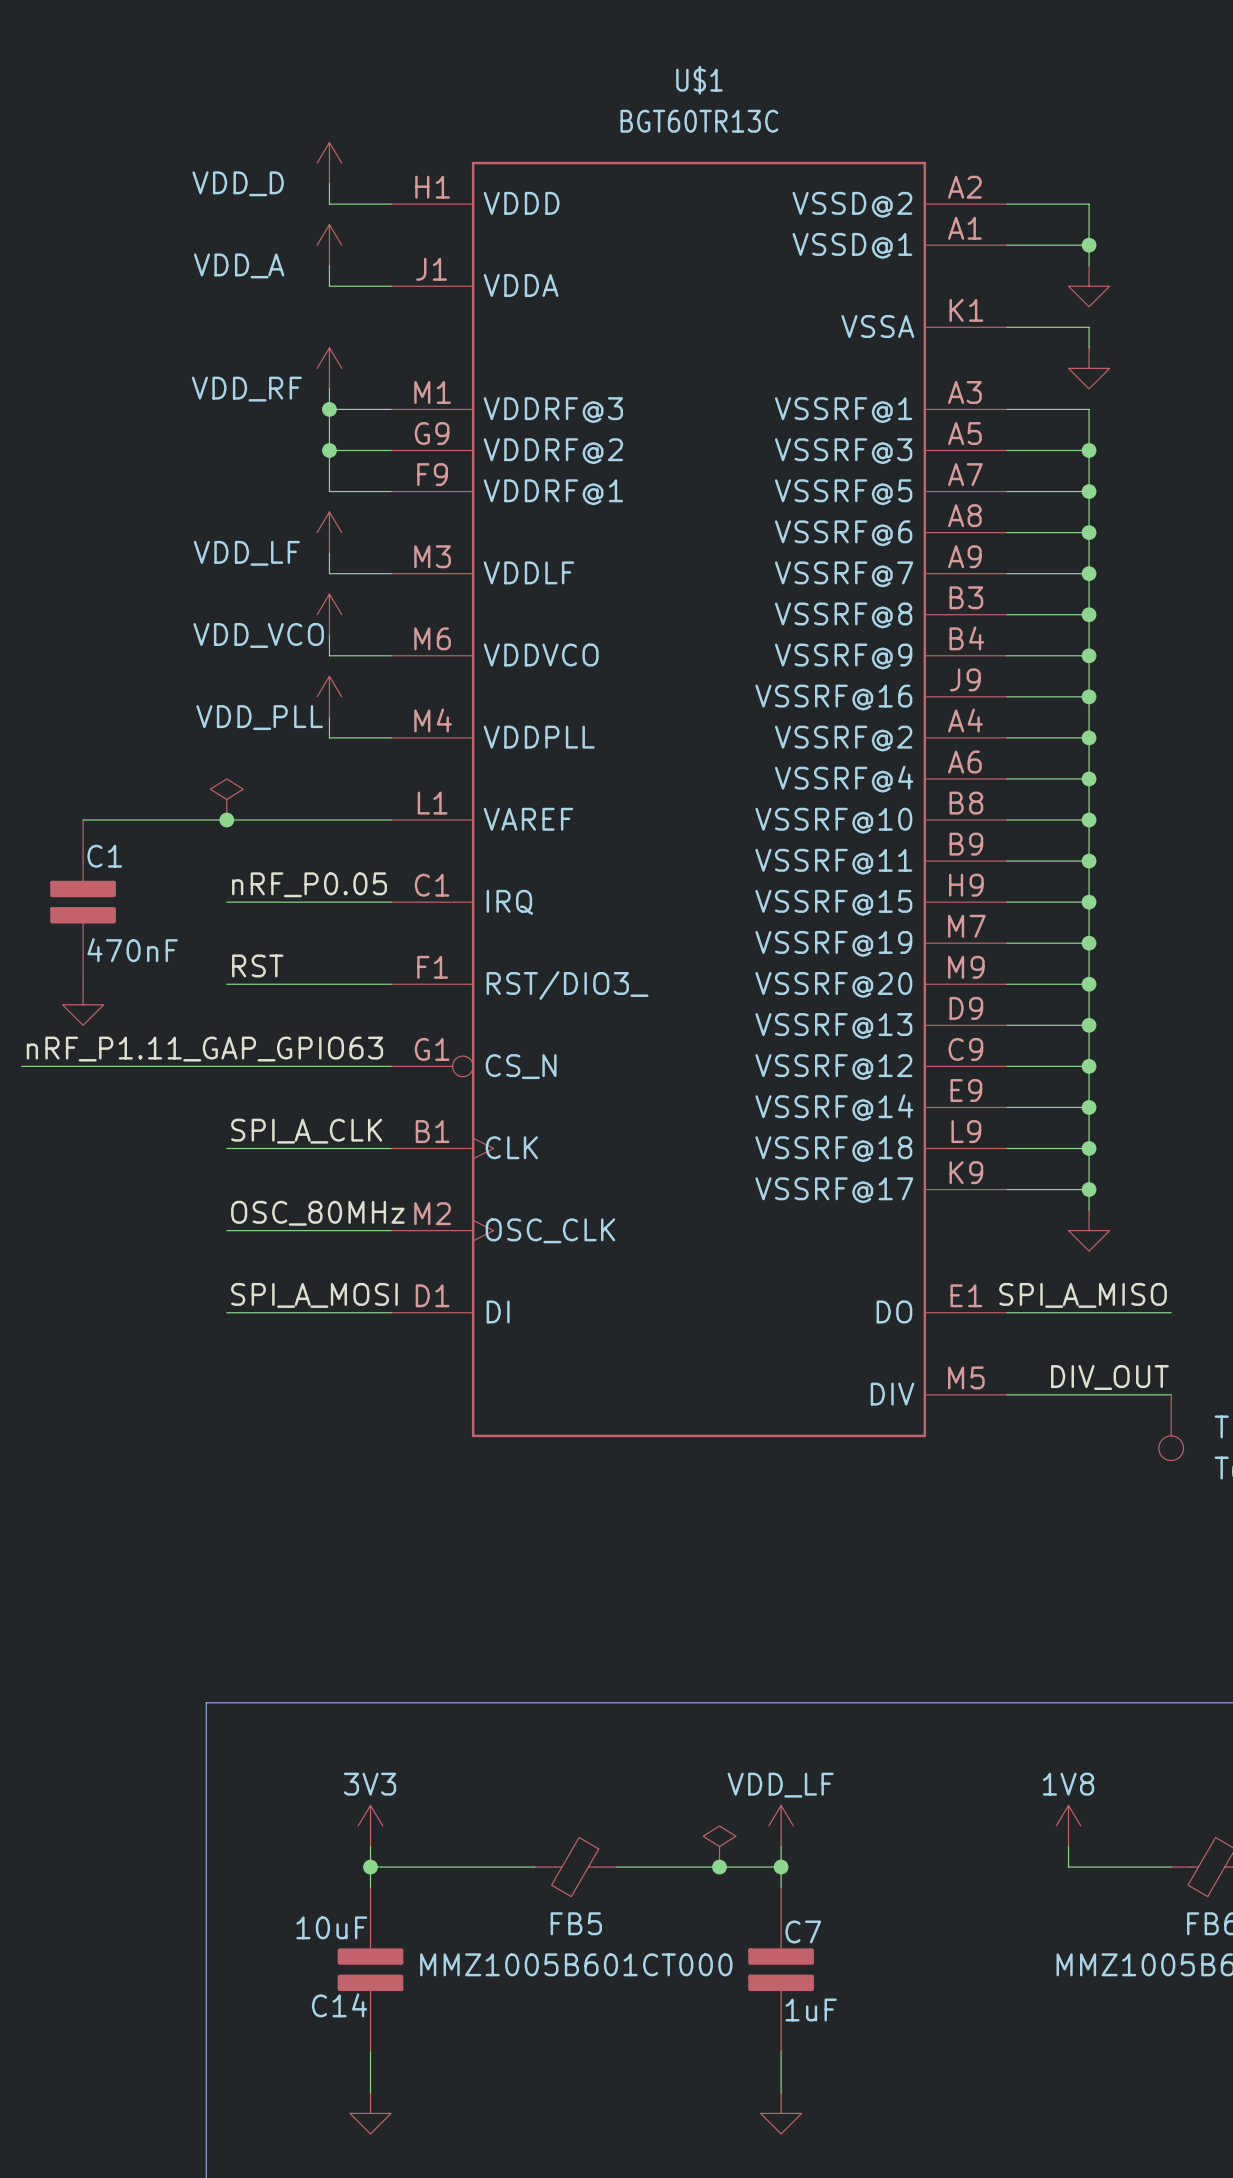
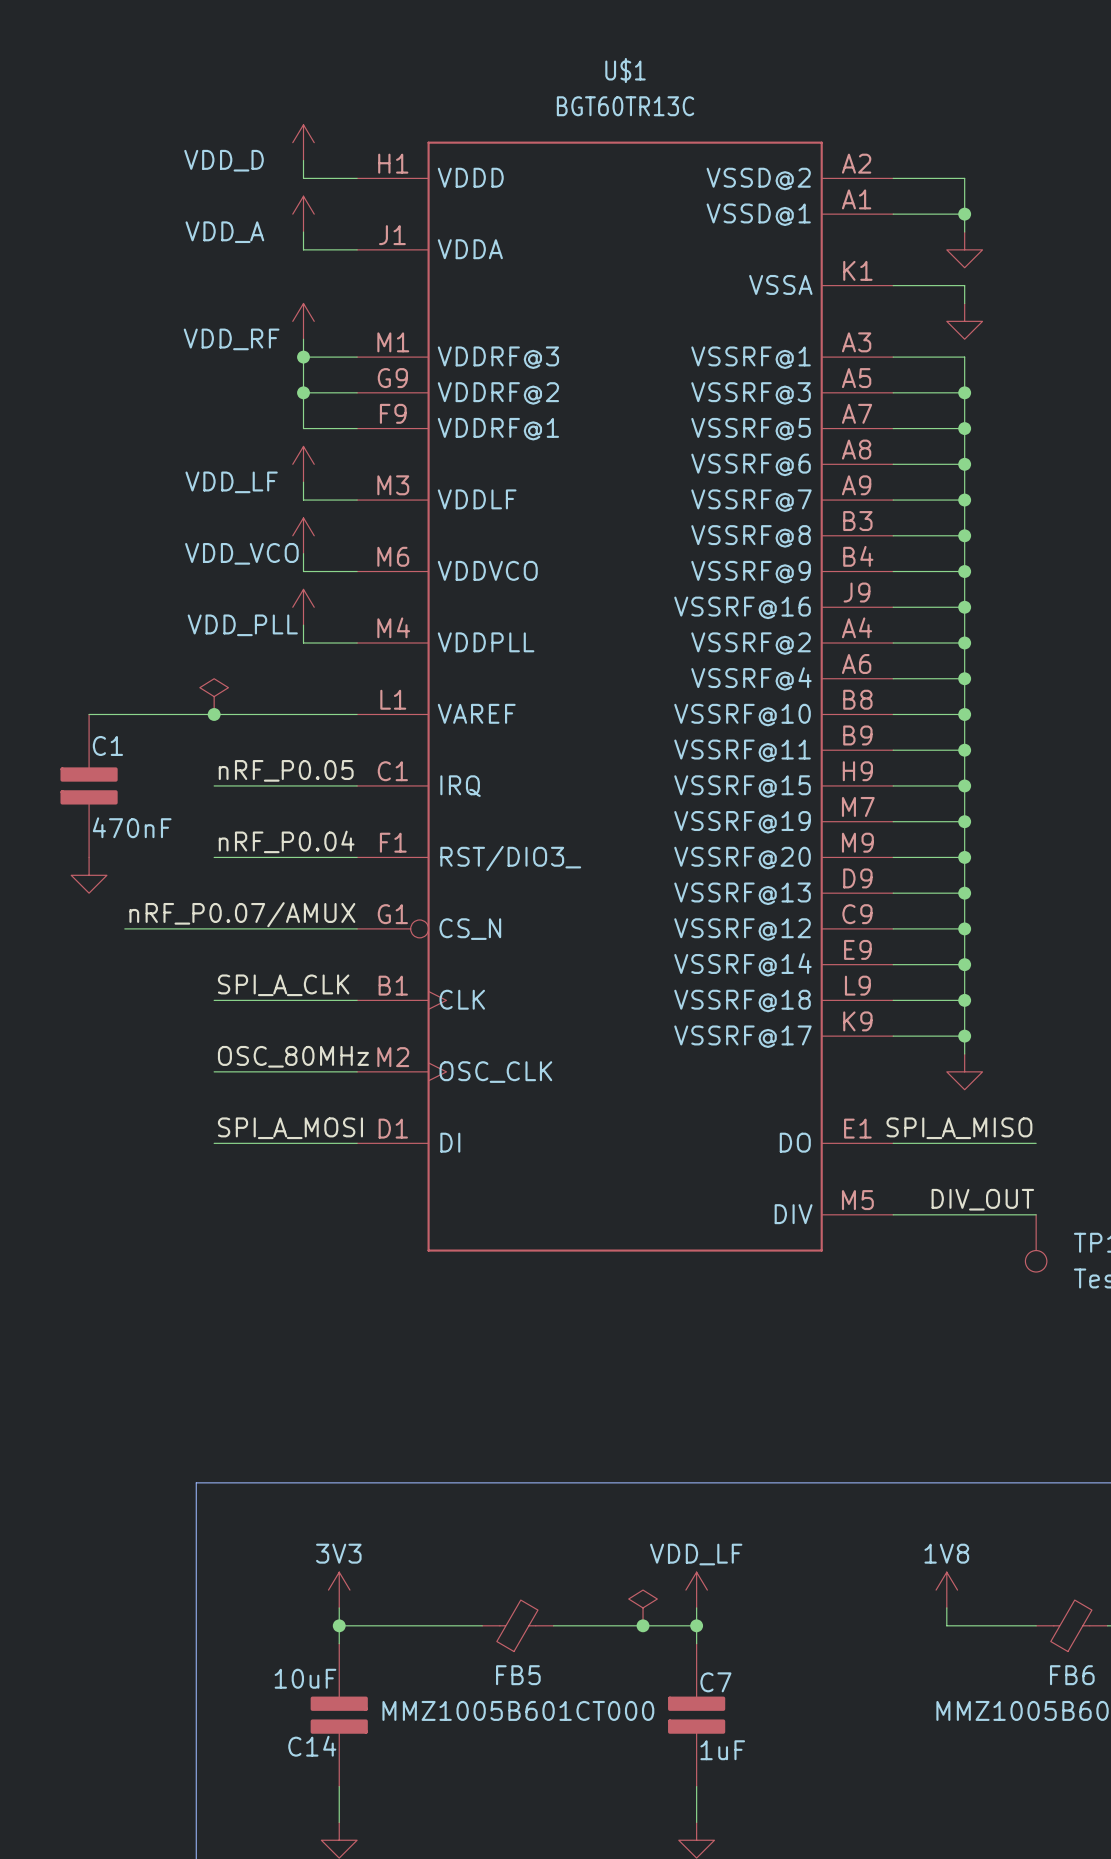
label: RST (257, 965) -> nRF_P0.04 (286, 841)
label: nRF_P1.11_GAP_GPIO63 (204, 1049) -> none
label: none -> nRF_P0.07/AMUX (242, 914)
wire: (21, 1066) (124, 1066) -> none

